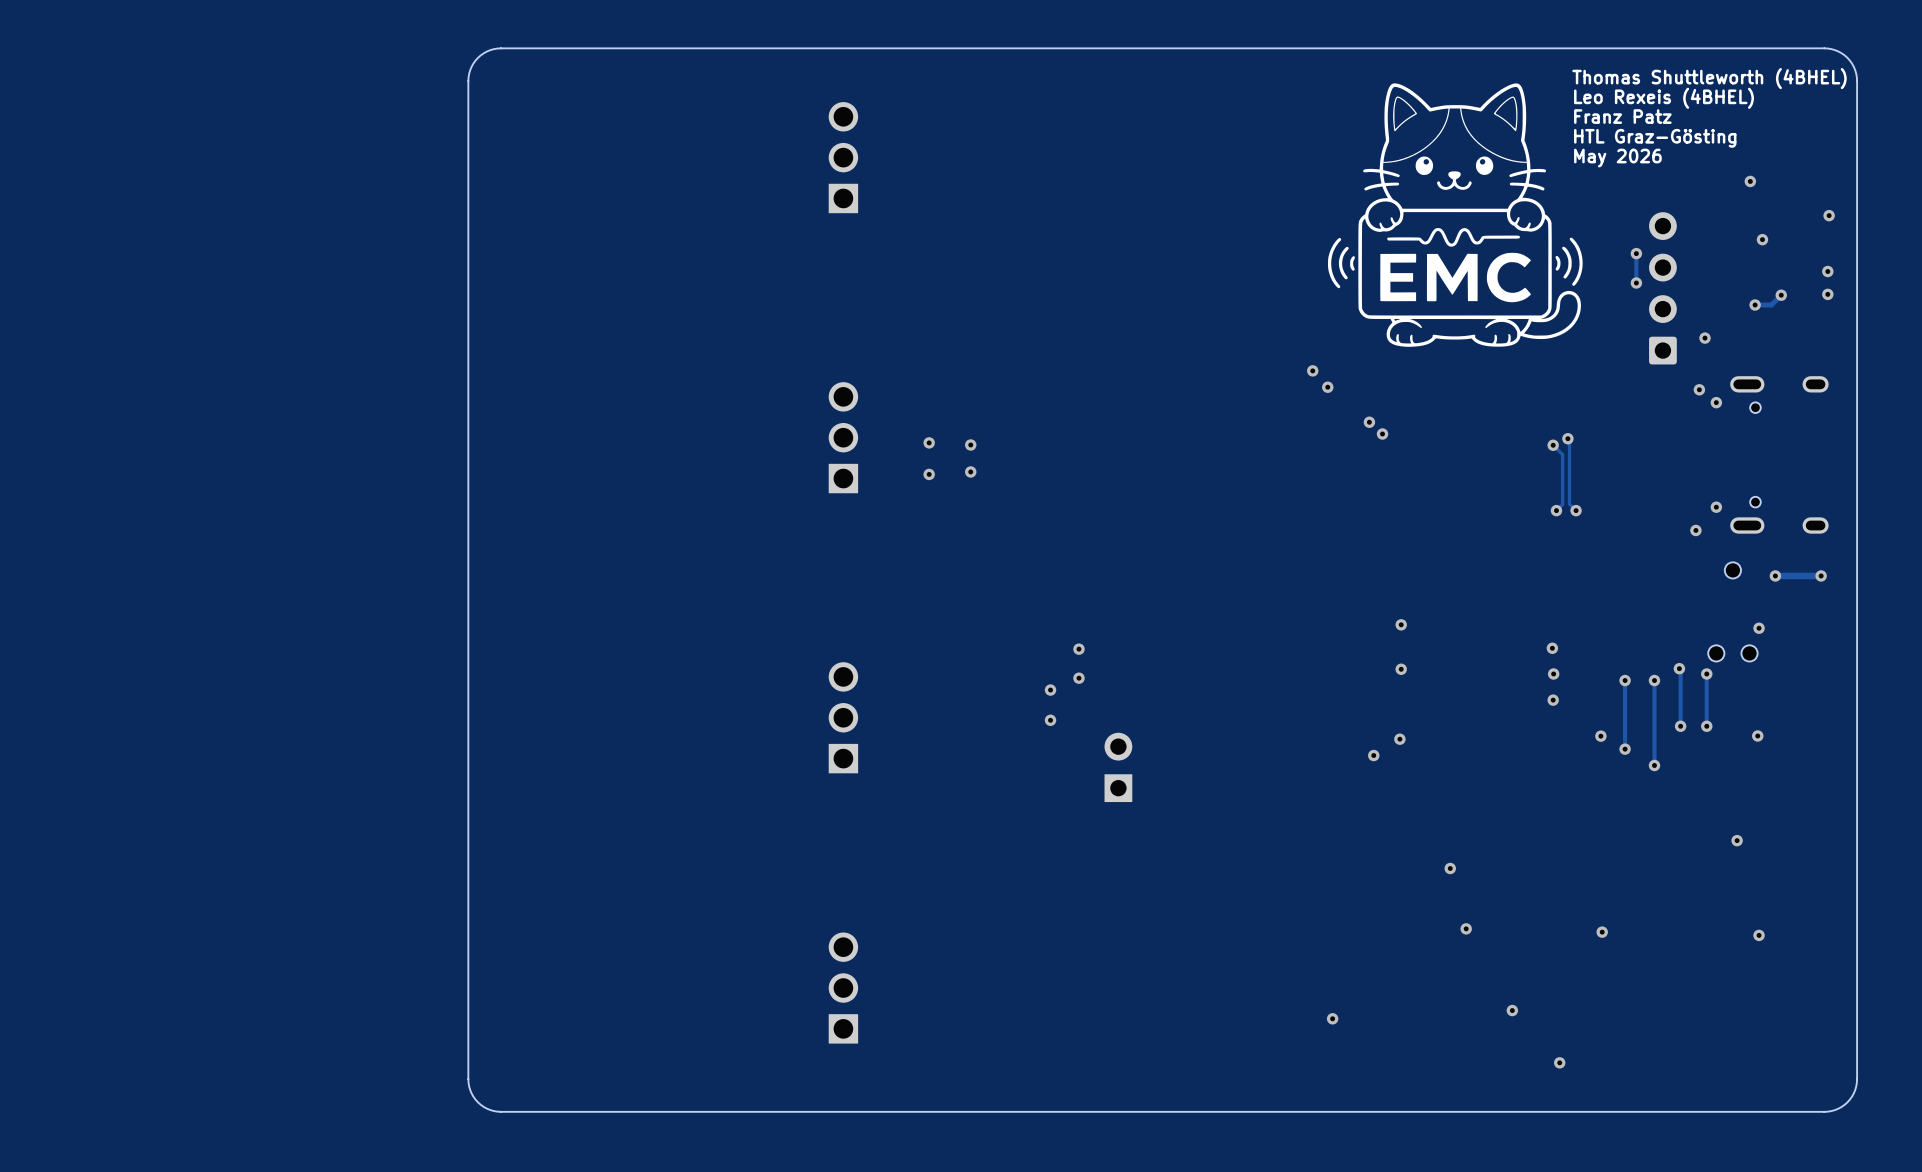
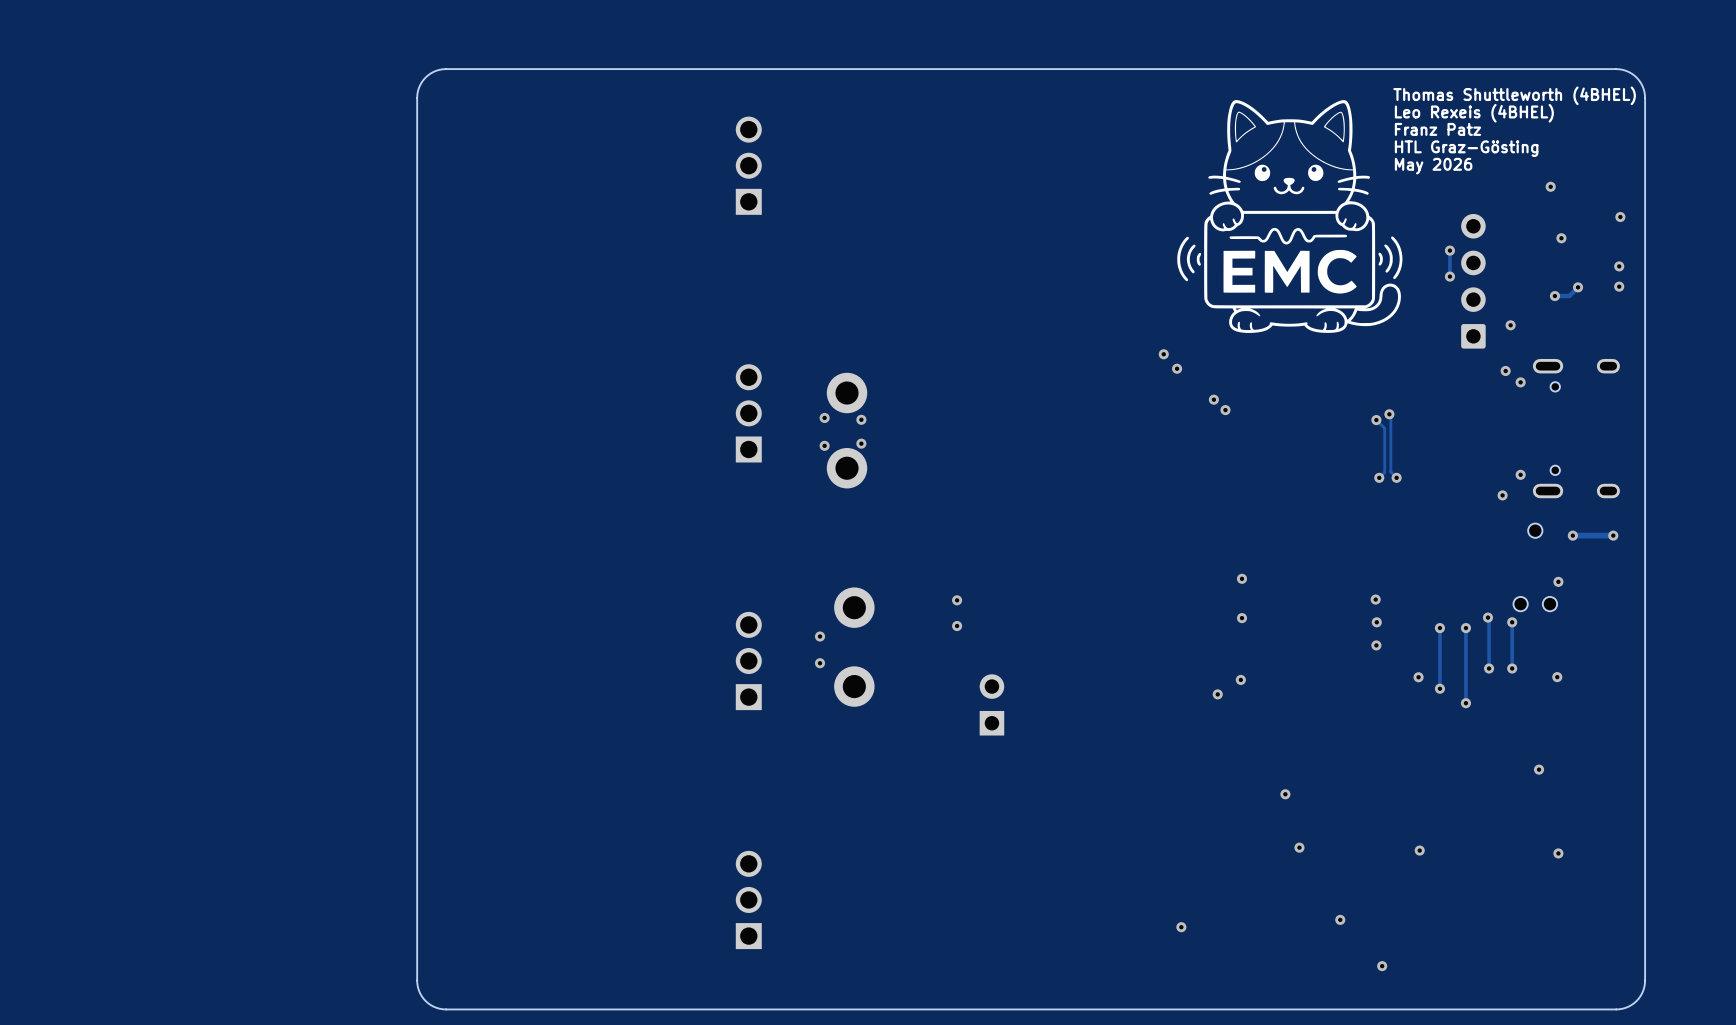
part: none -> (847, 393)
part: none -> (847, 468)
part: none -> (854, 607)
via: none -> (820, 636)
via: (1050, 690) -> none
via: none -> (820, 663)
via: (1050, 720) -> none
part: none -> (854, 686)

